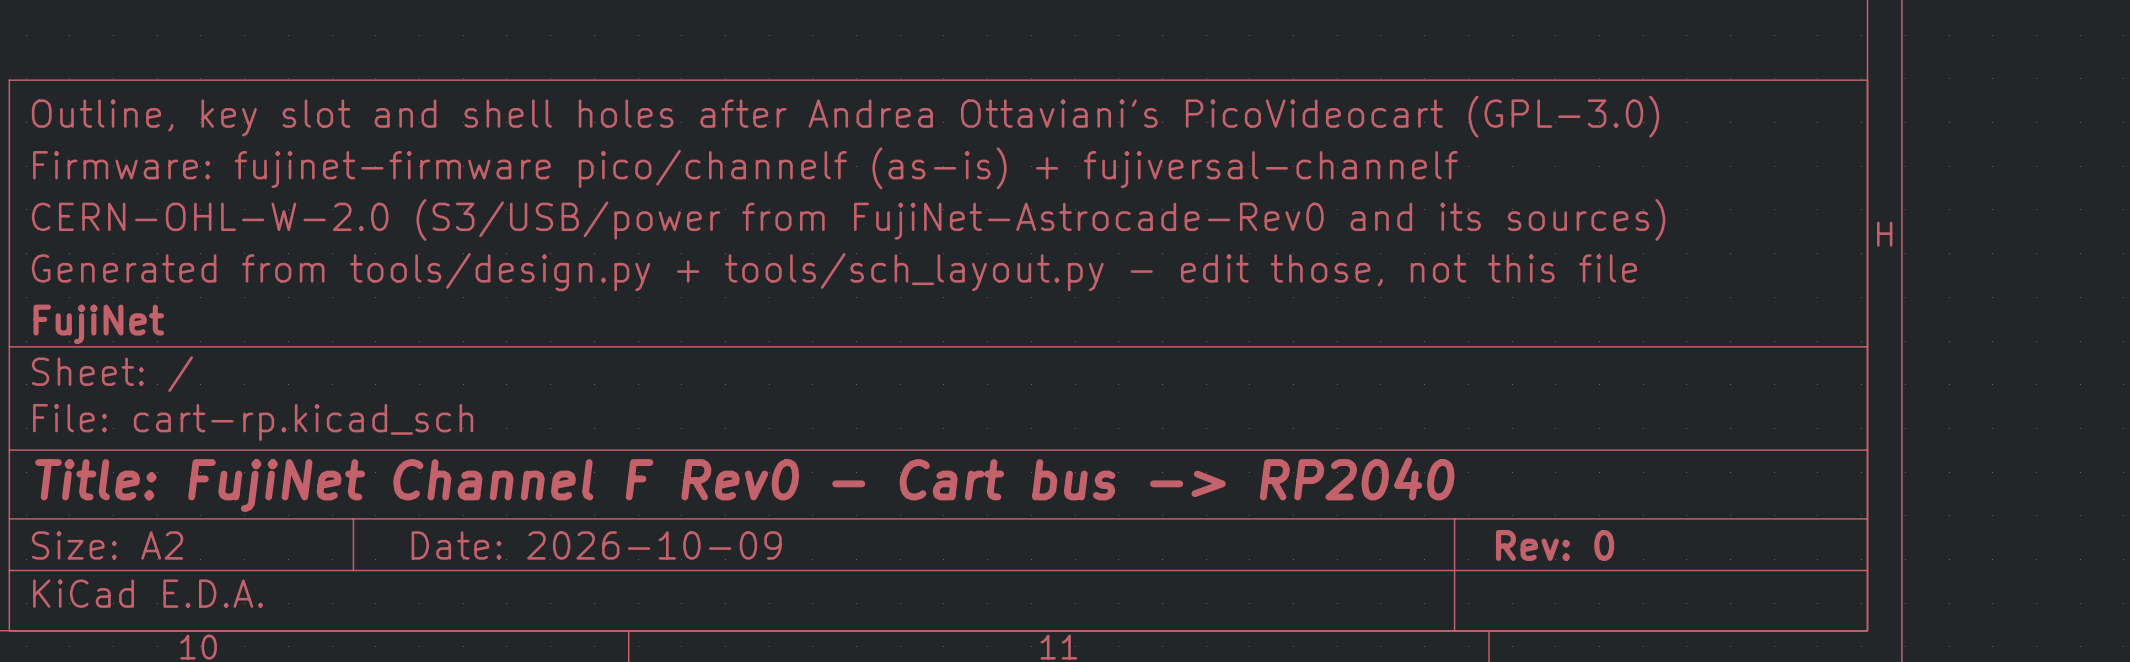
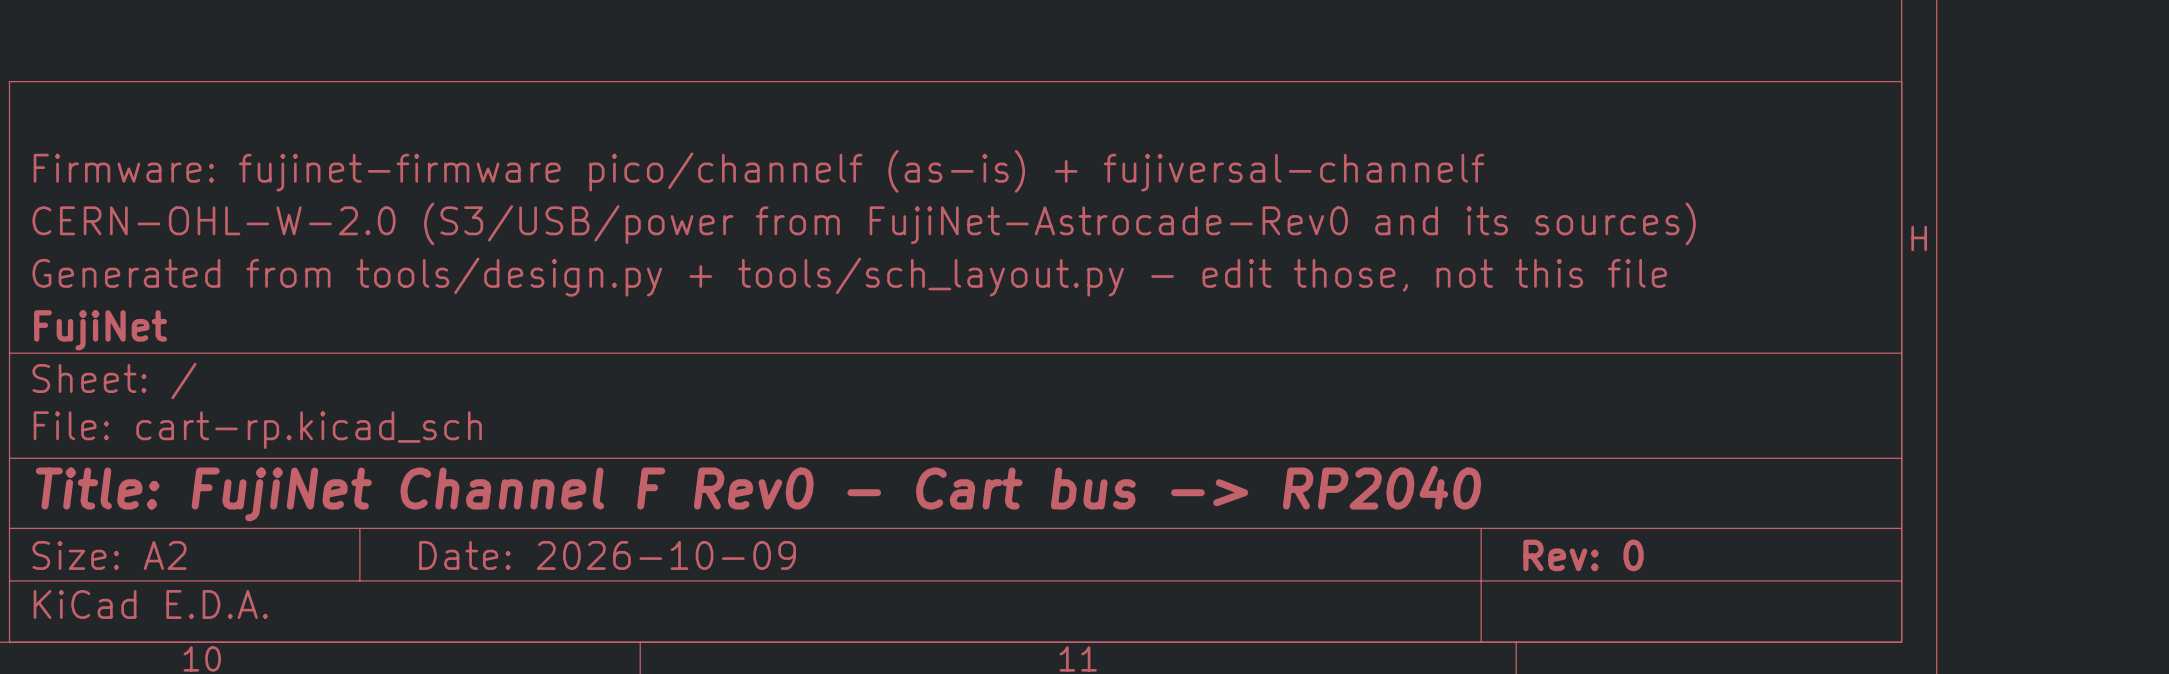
title block: Outline, key slot and shell holes after Andrea Ottaviani's PicoVideocart (GPL-3.0) (845, 116) -> none

